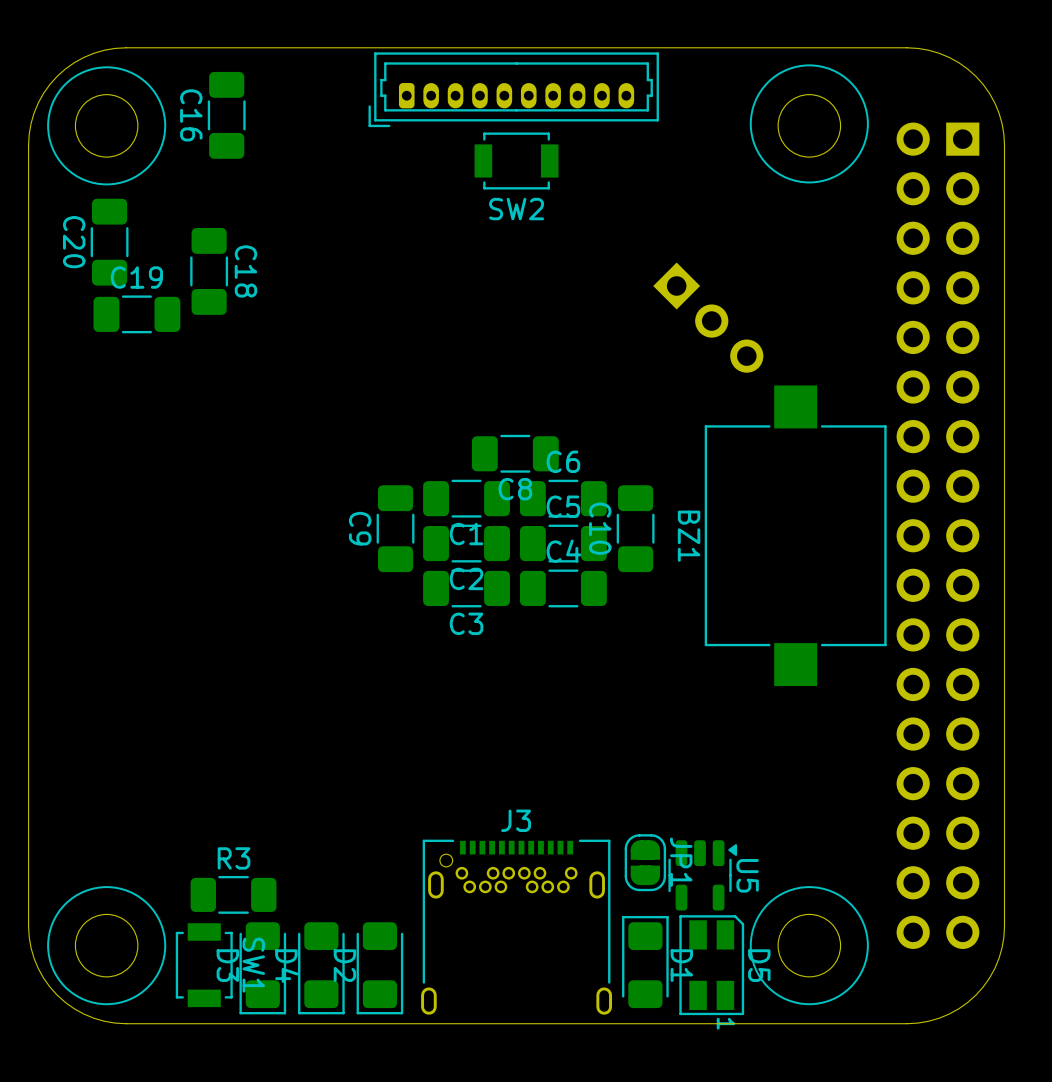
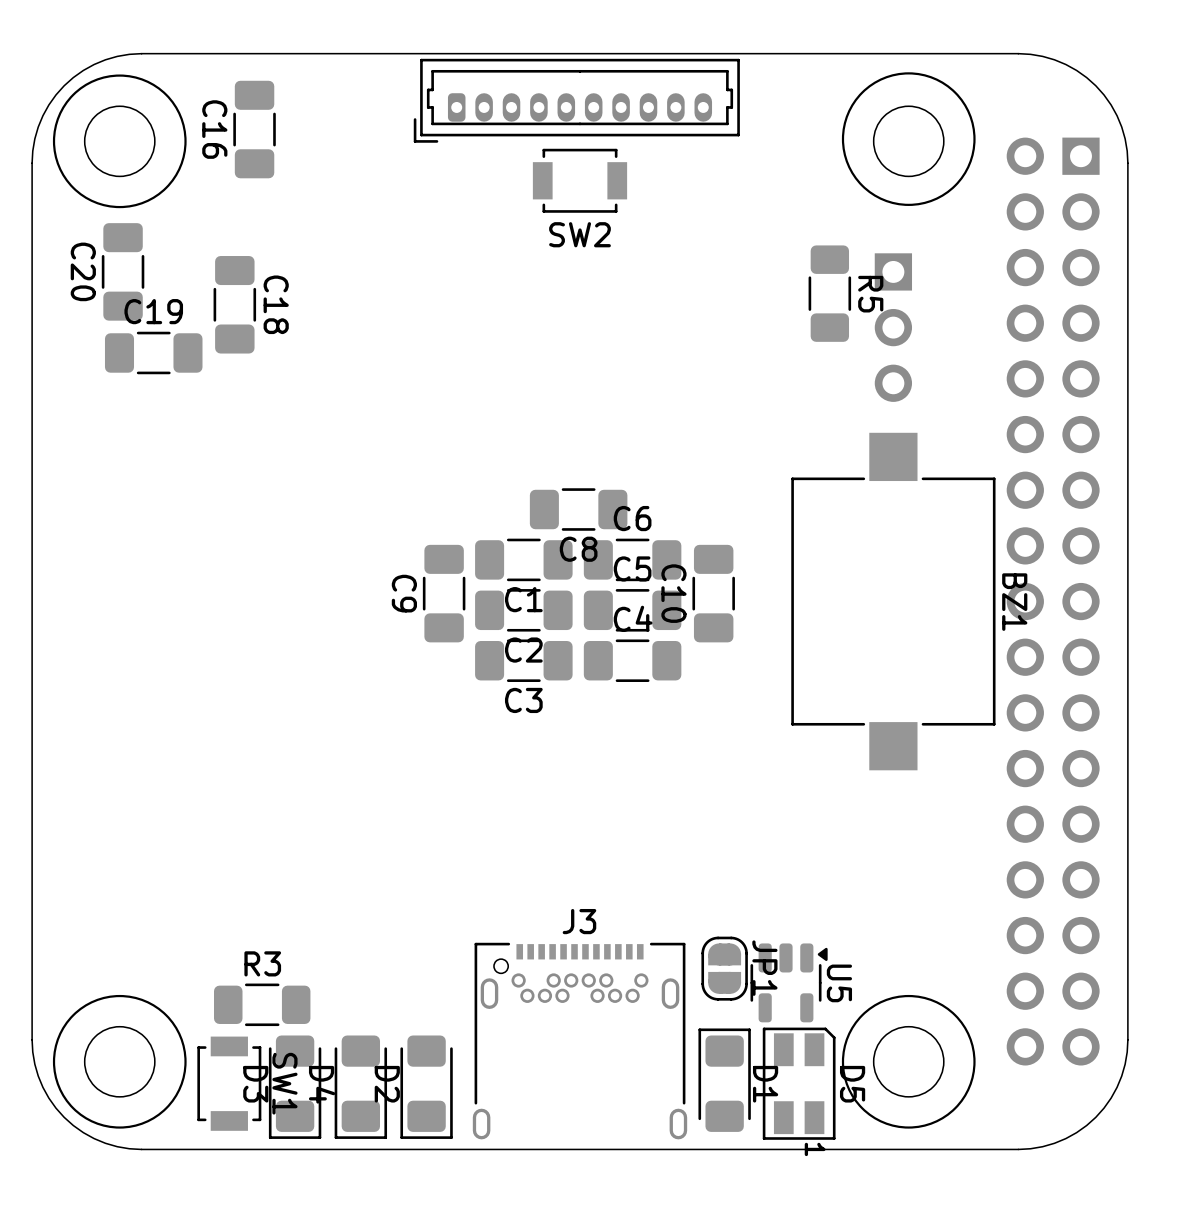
R5: none -> (829, 293)
part: none -> (893, 327)
part: (708, 317) -> none
BZ1 name position: BZ1 (689, 536) -> BZ1 (1014, 602)

